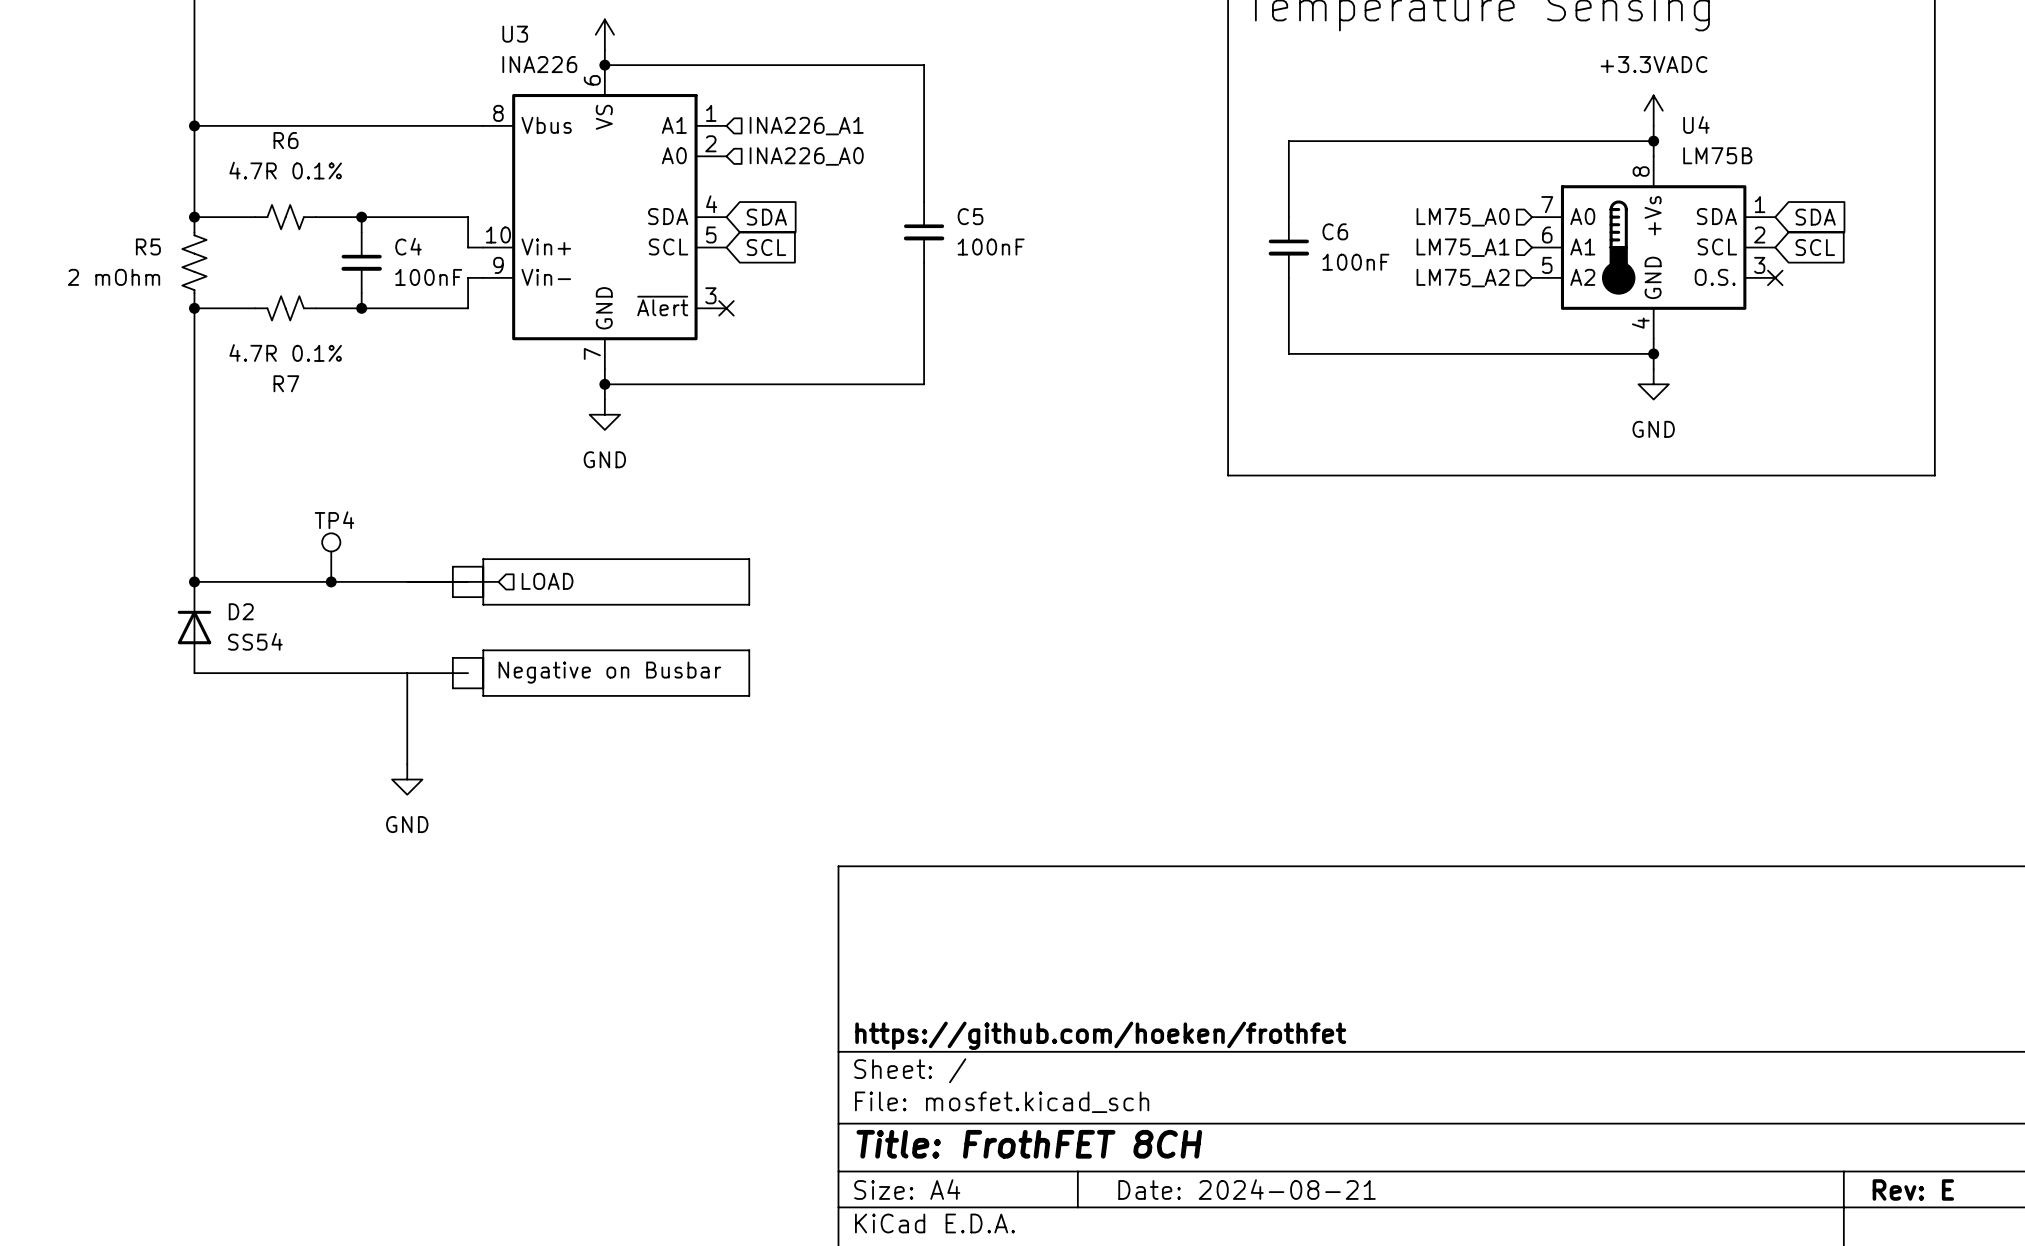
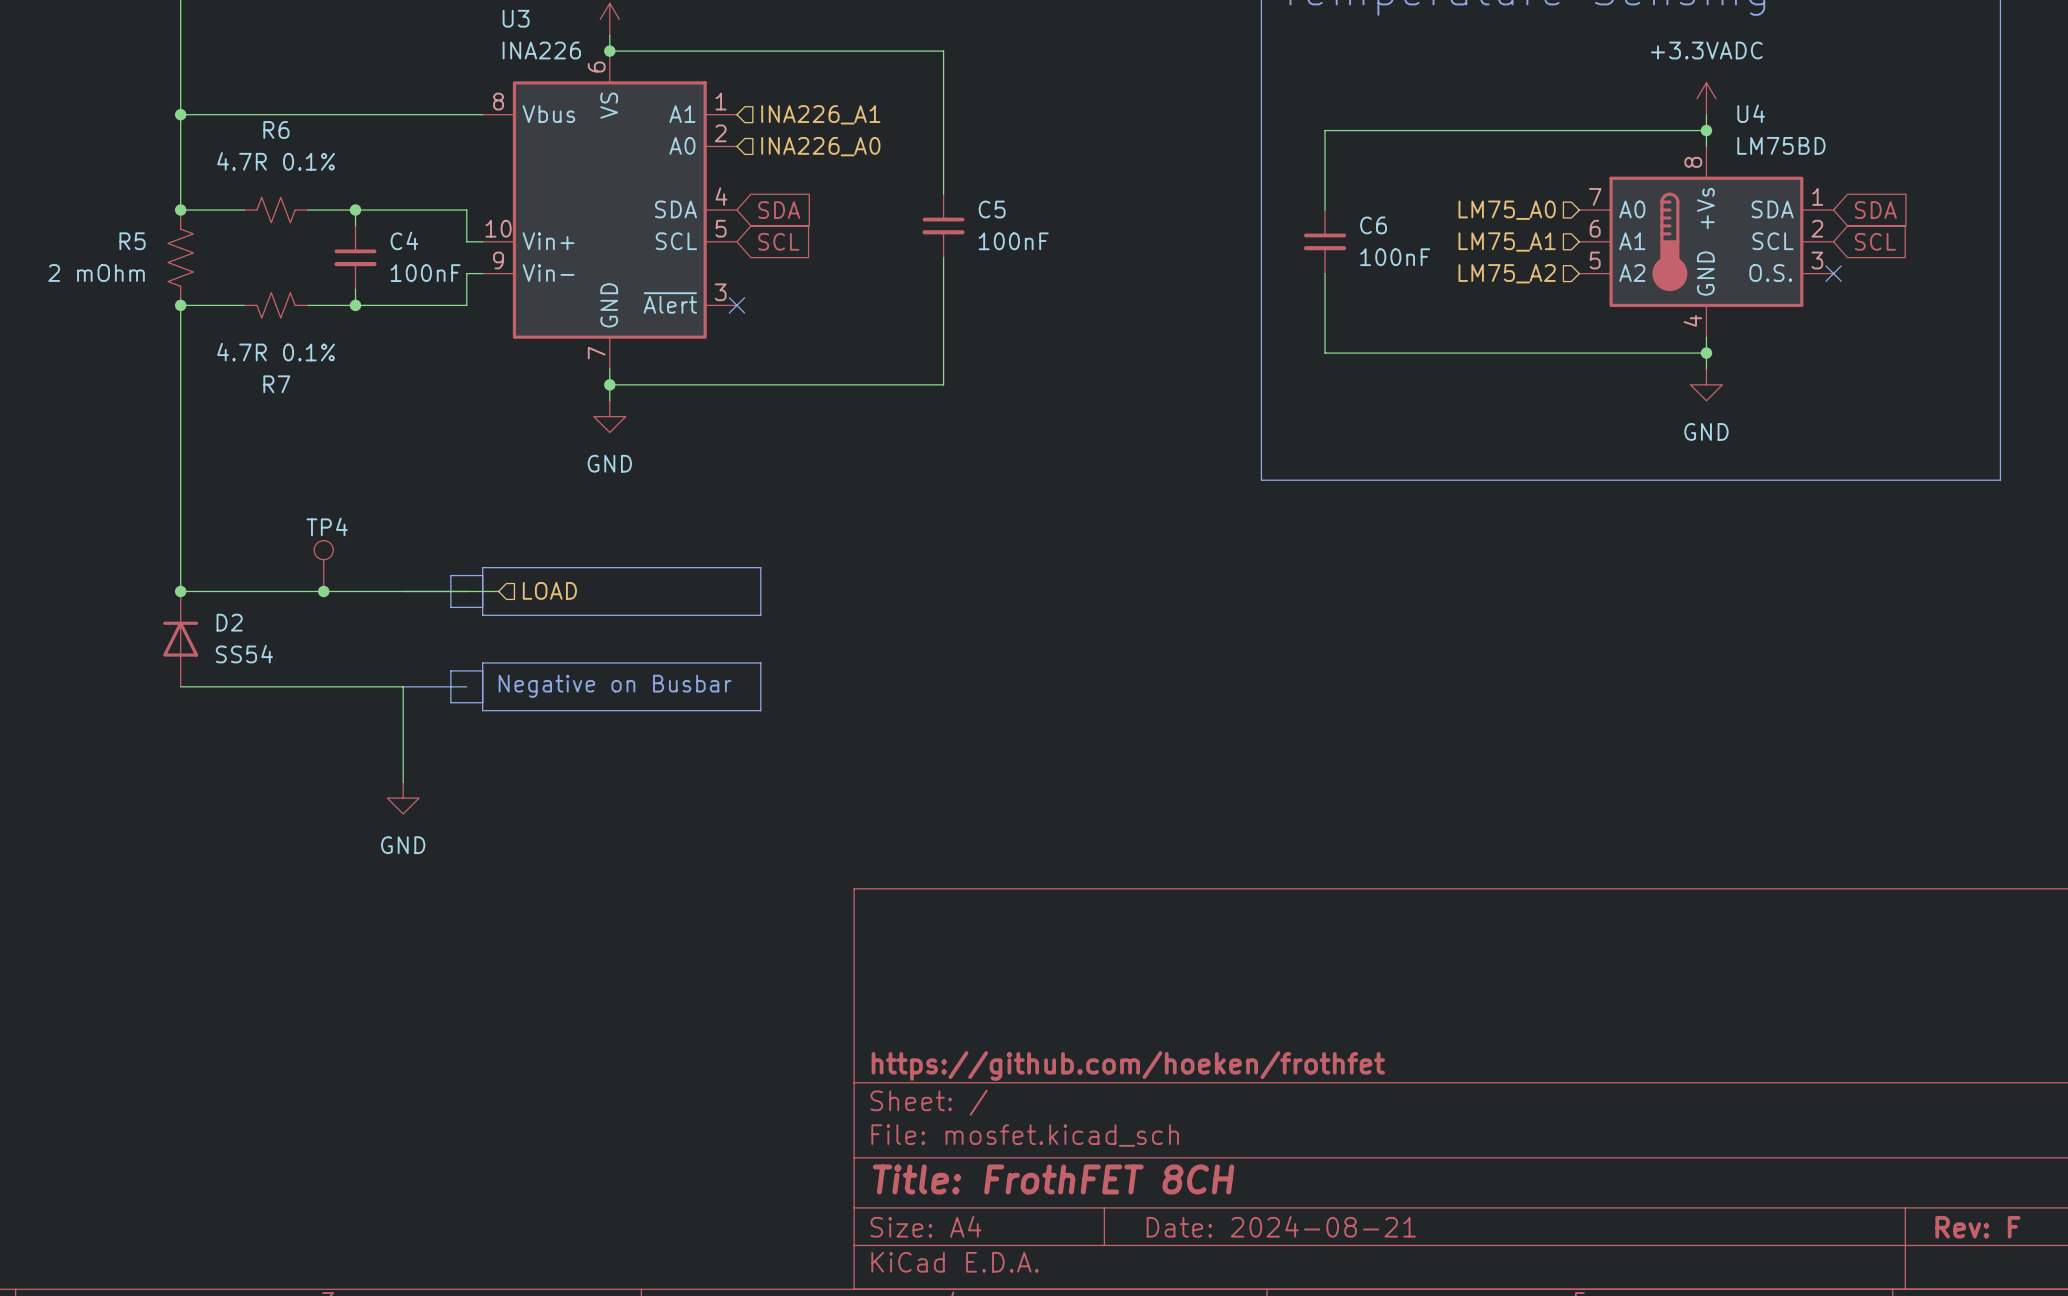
U4 value: LM75B (1717, 155) -> LM75BD (1781, 145)
title block: Rev: E (1913, 1189) -> Rev: F (1977, 1227)

